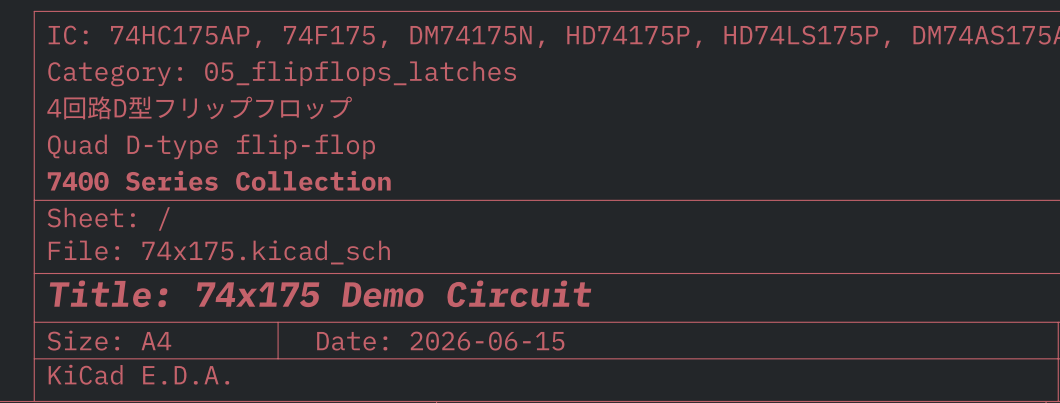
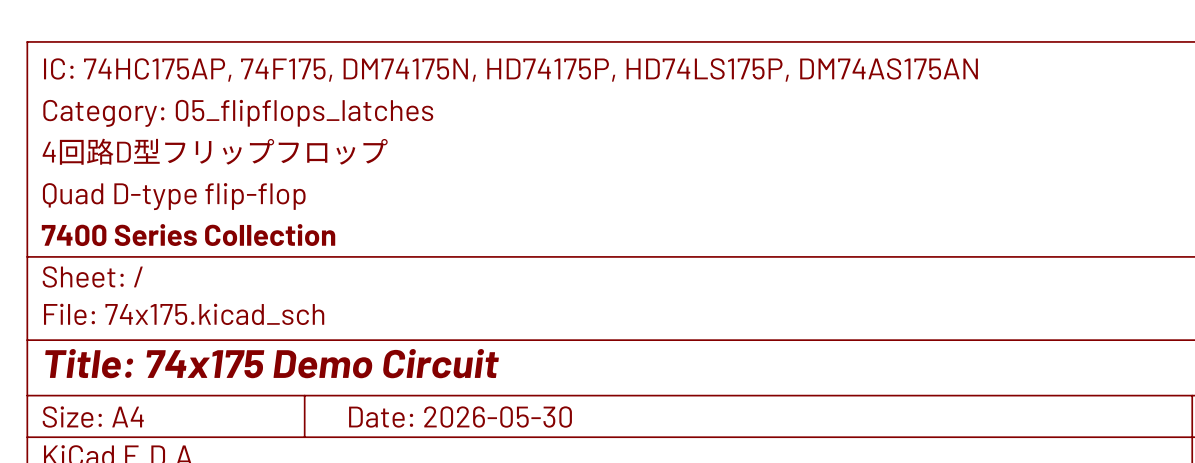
title block: Date: 2026-06-15 (440, 341) -> Date: 2026-05-30 (460, 417)

